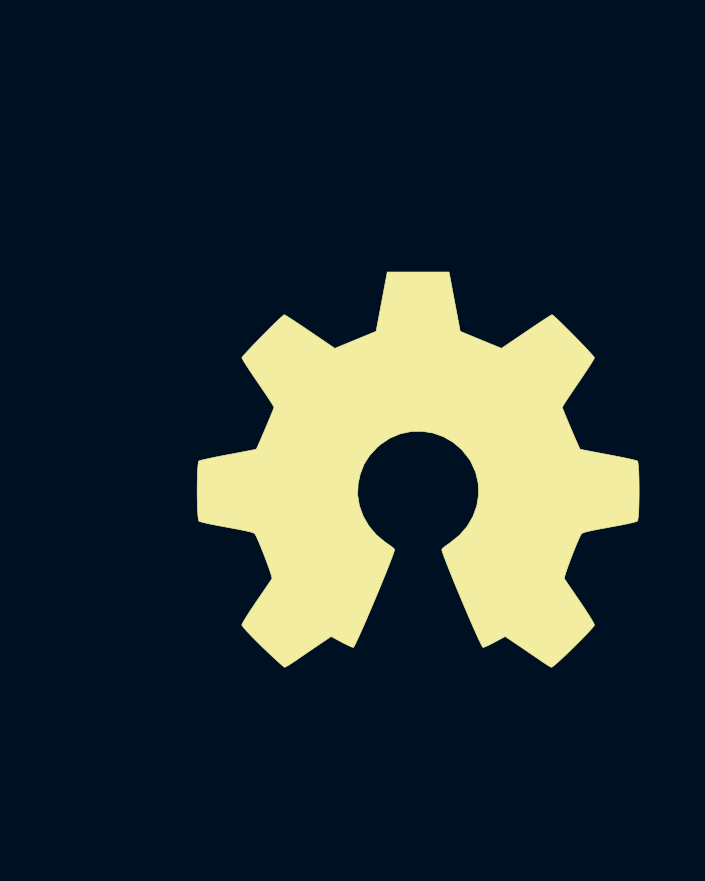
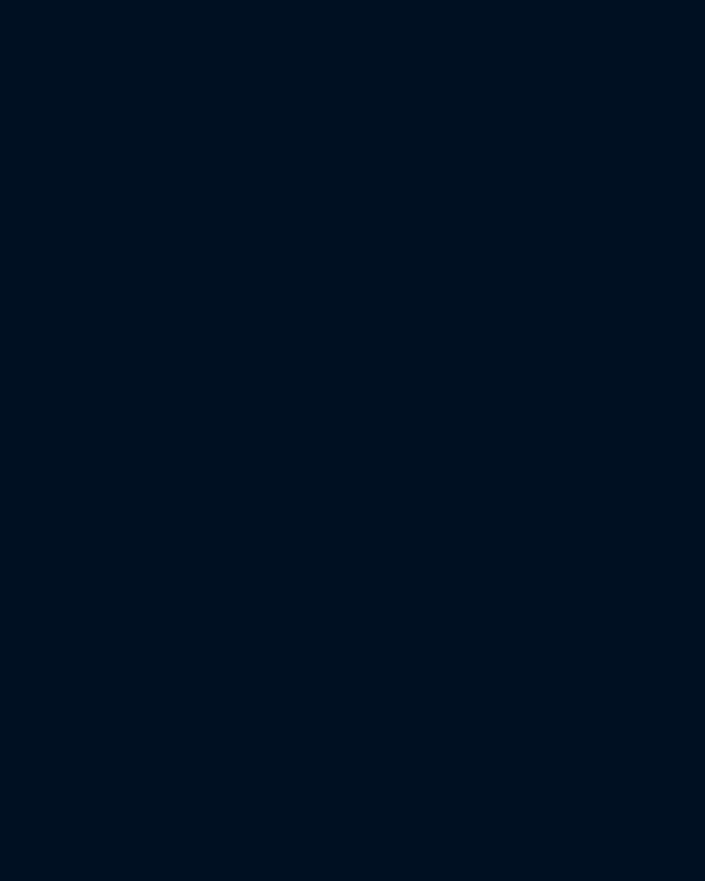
drawing: [196, 271, 640, 668] -> none

